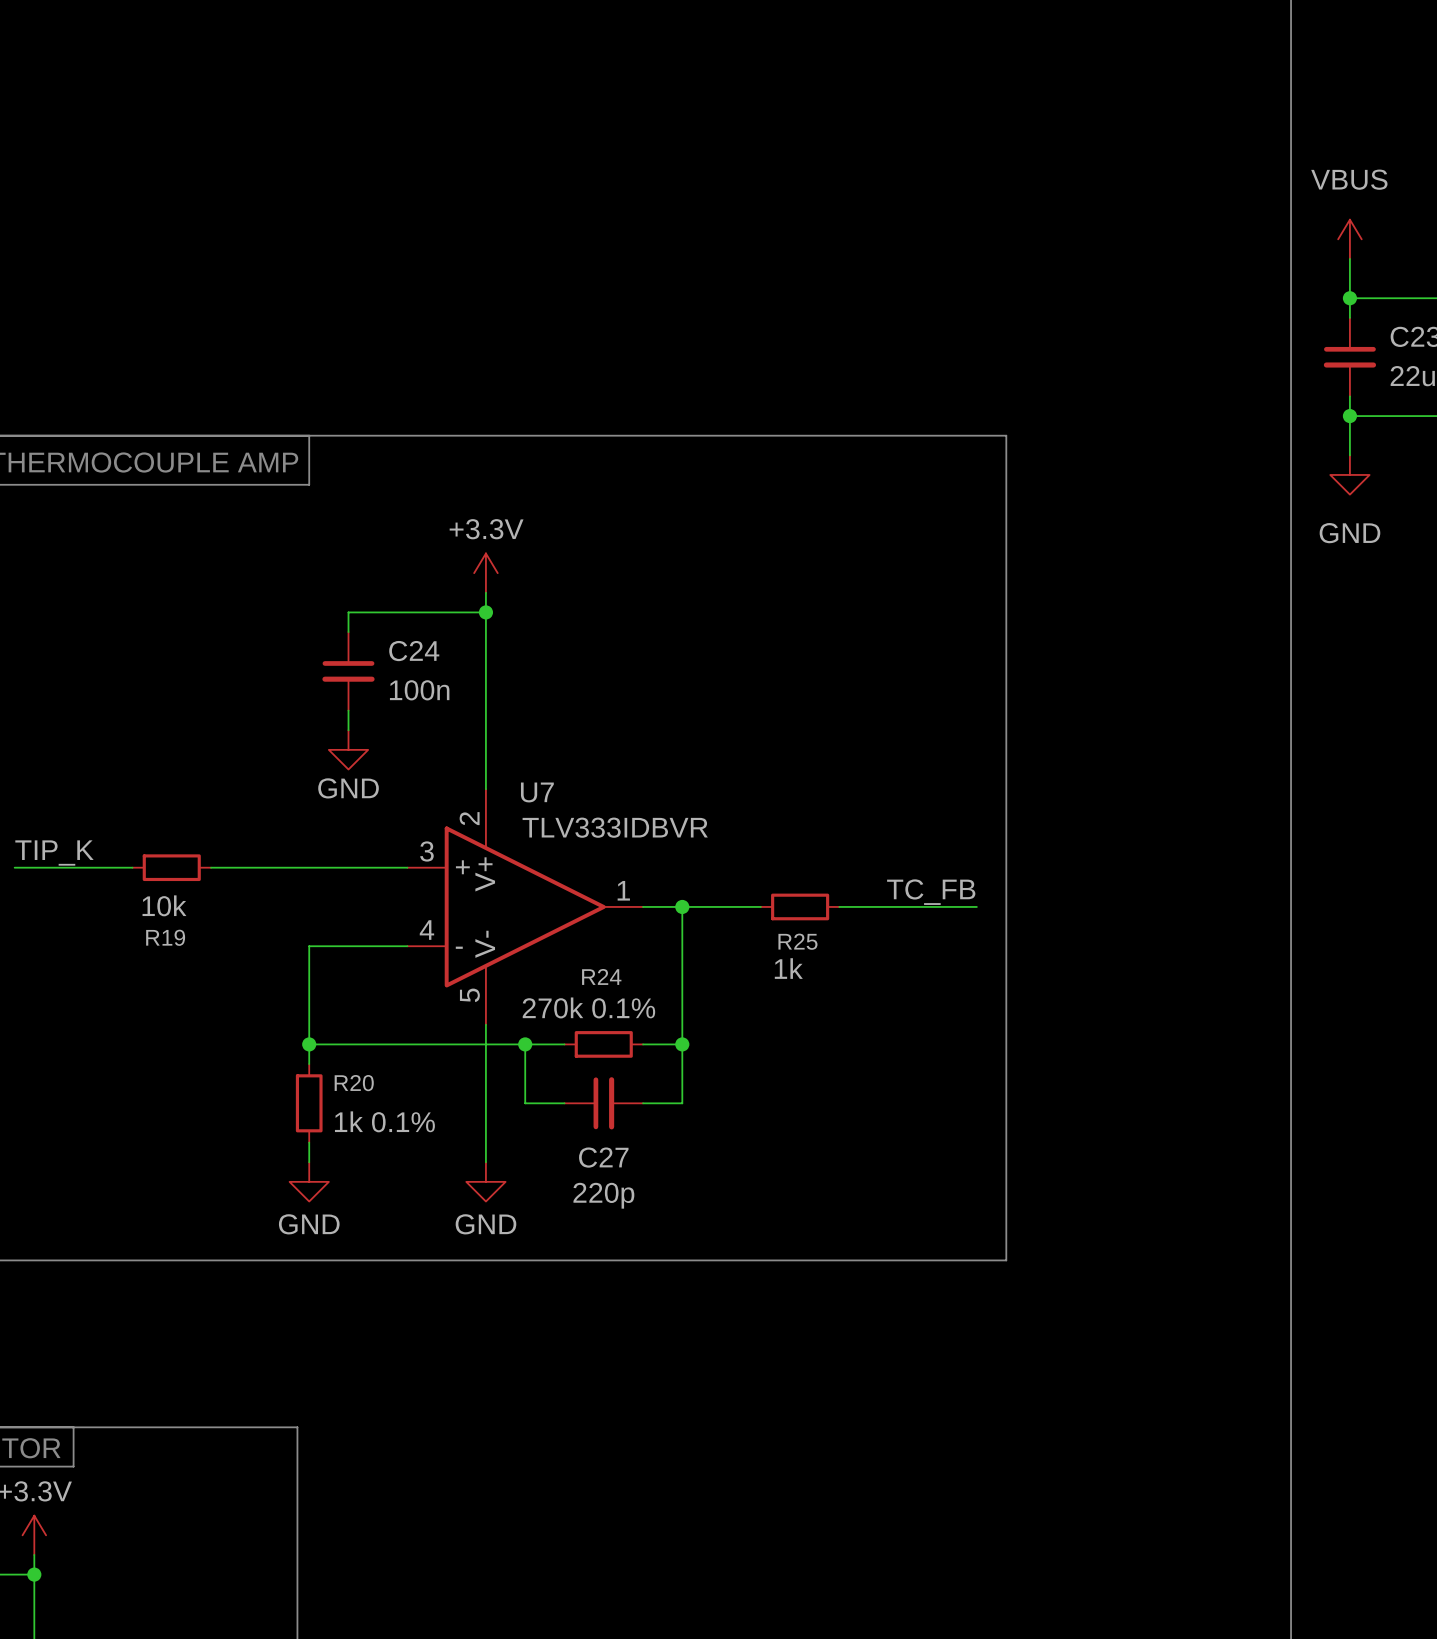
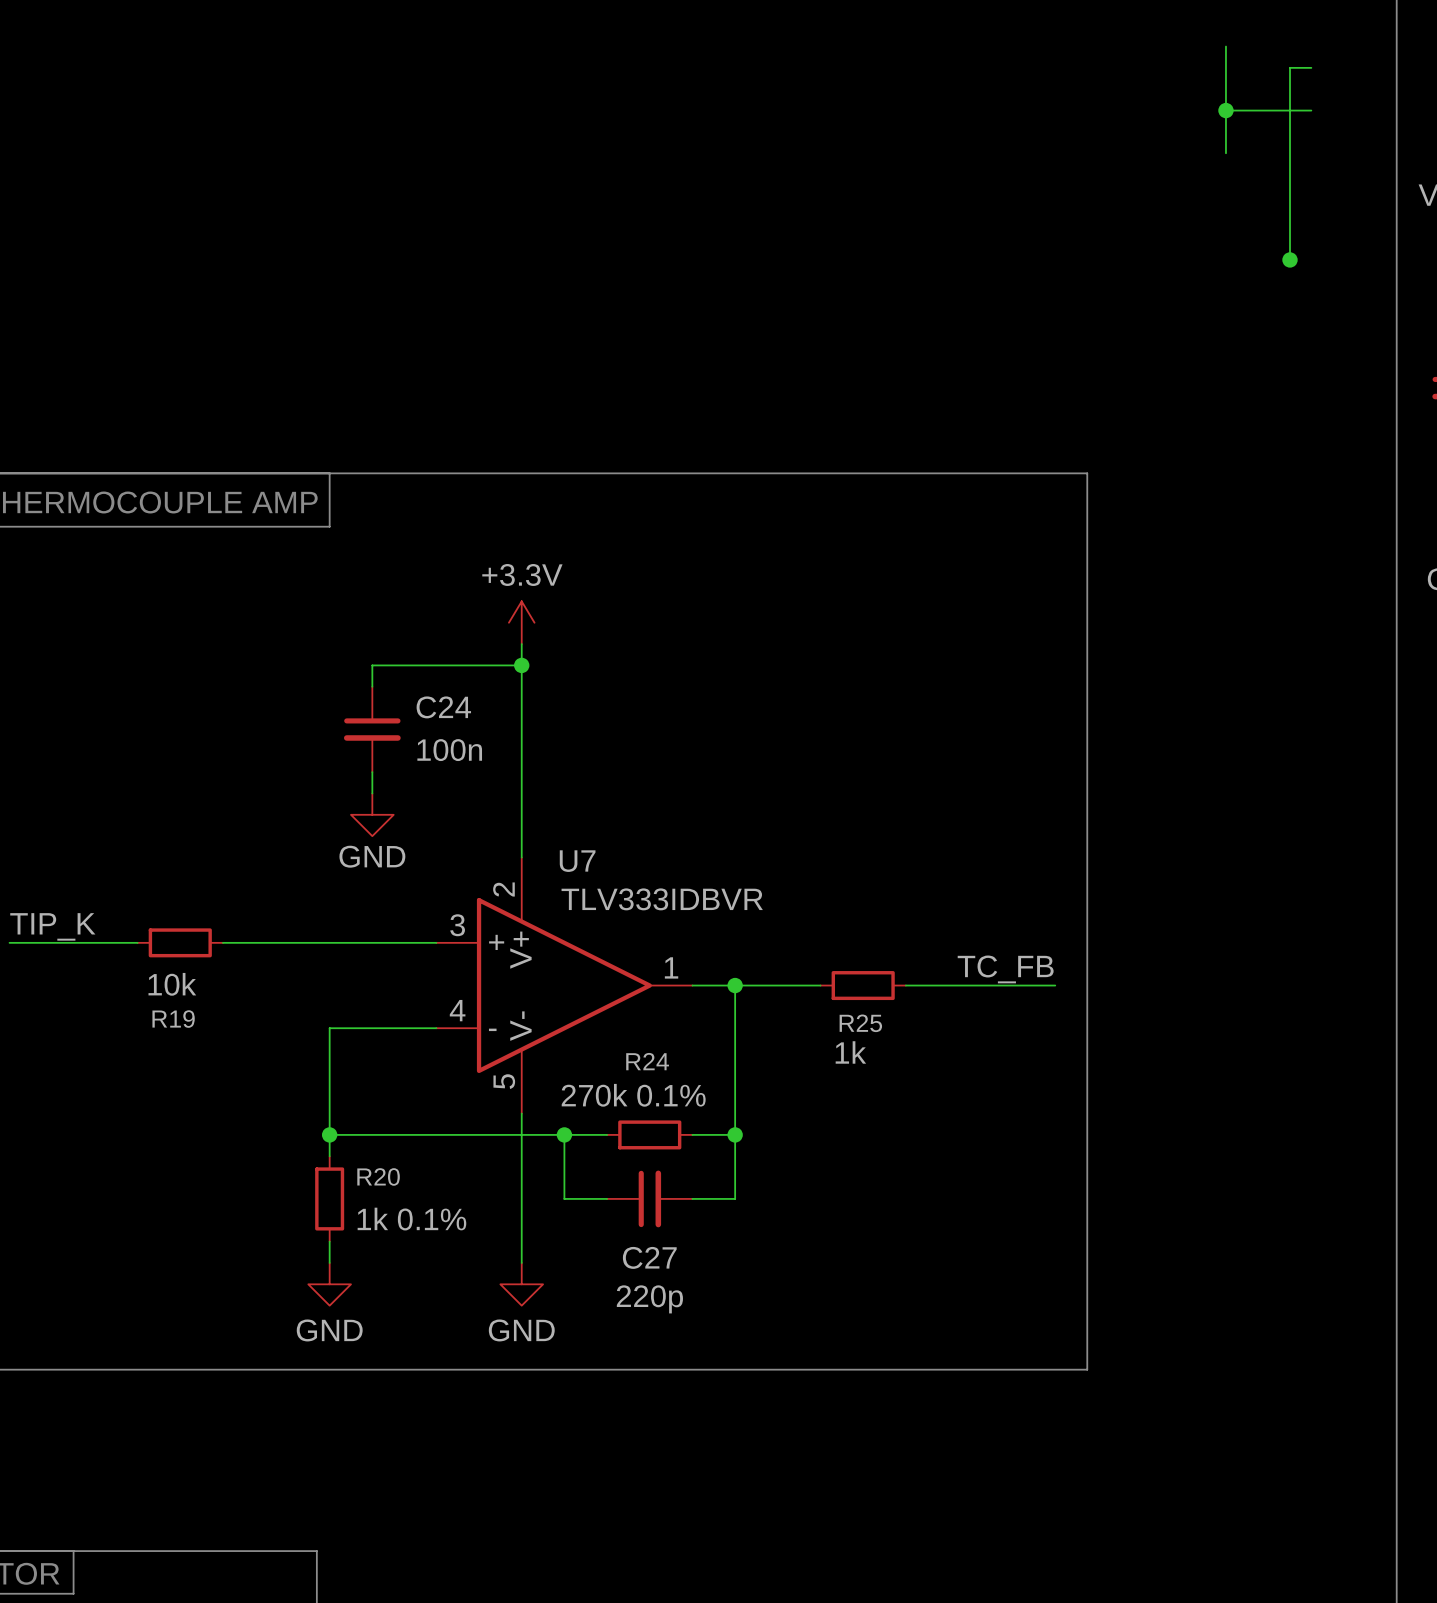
wire: none -> (1225, 46) (1225, 153)
wire: none -> (1311, 67) (1290, 67) (1290, 259)
wire: none -> (1225, 110) (1311, 110)
junction: none -> (1225, 110)
junction: none -> (1290, 259)

